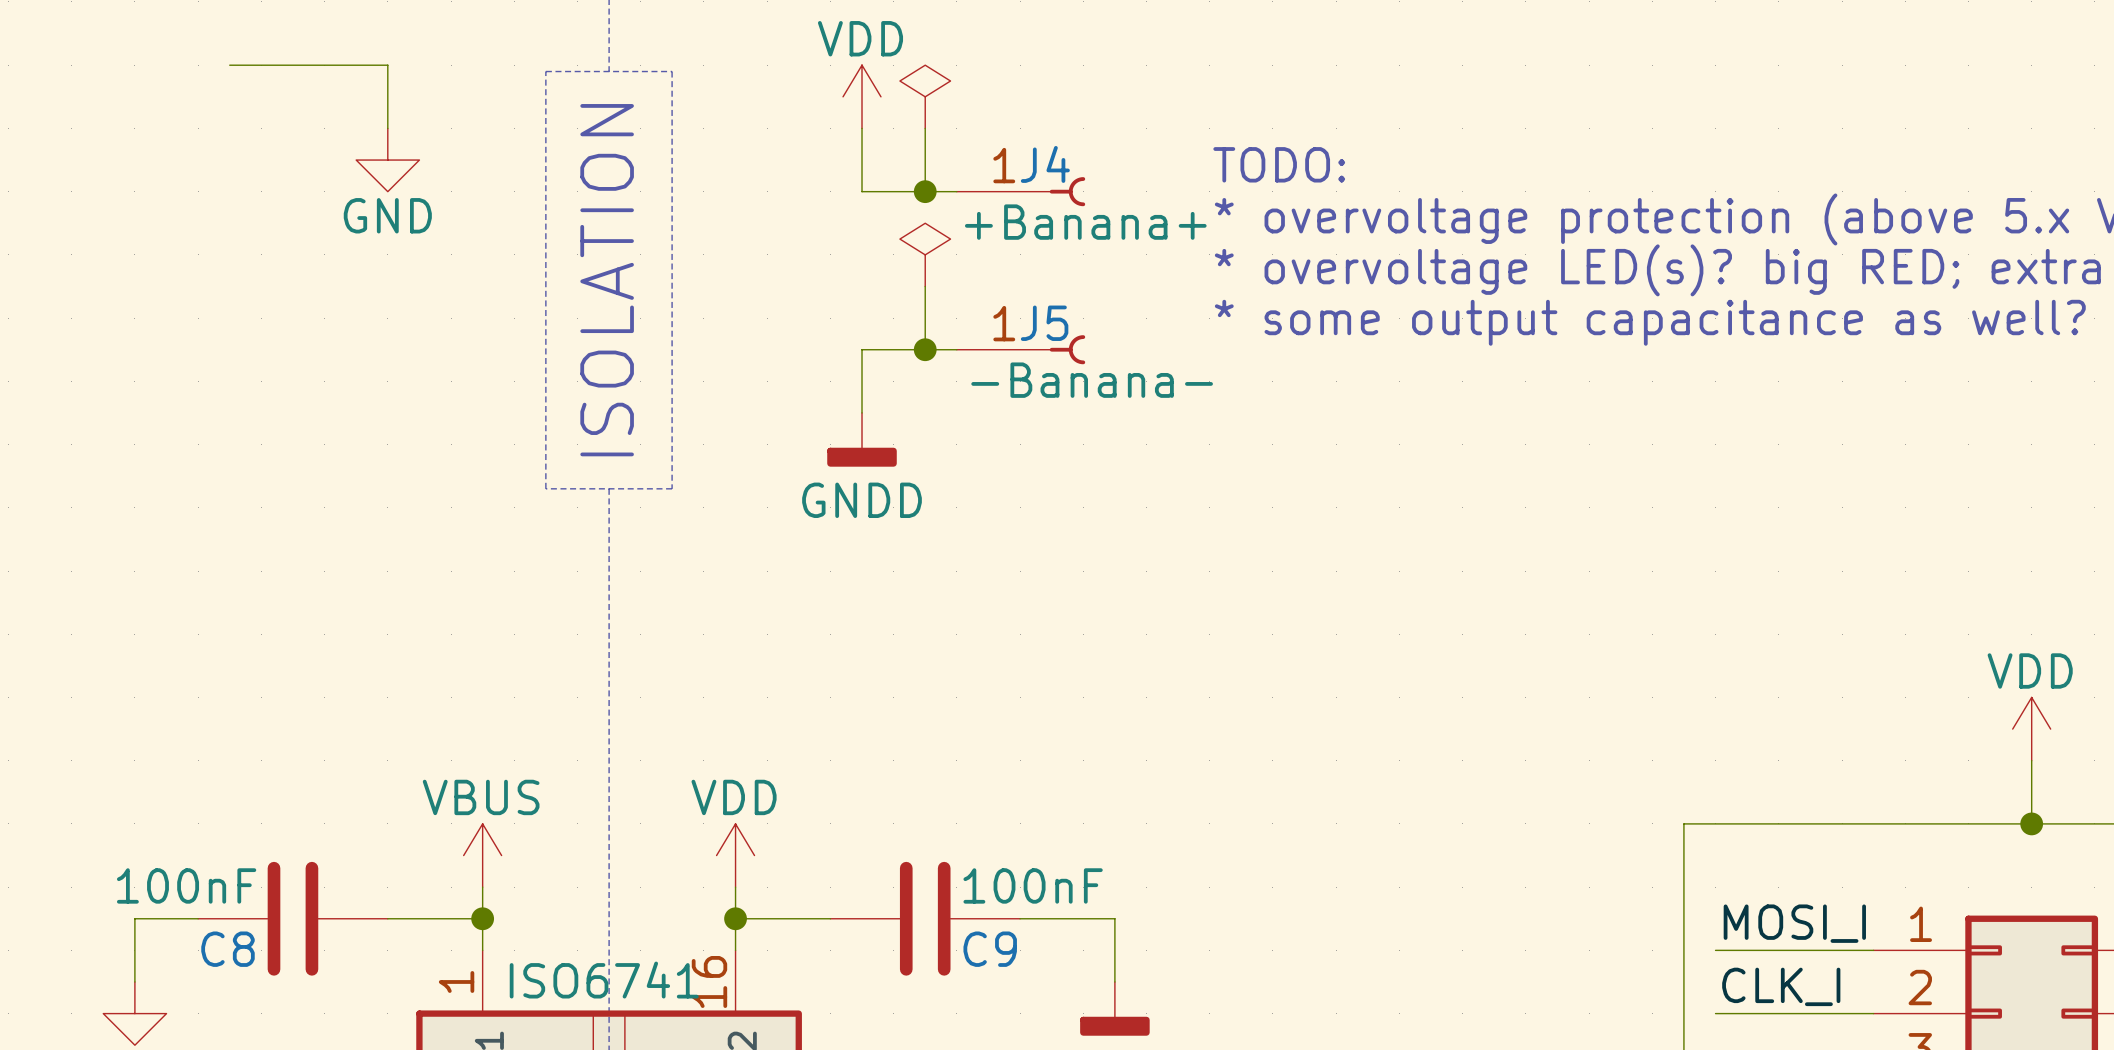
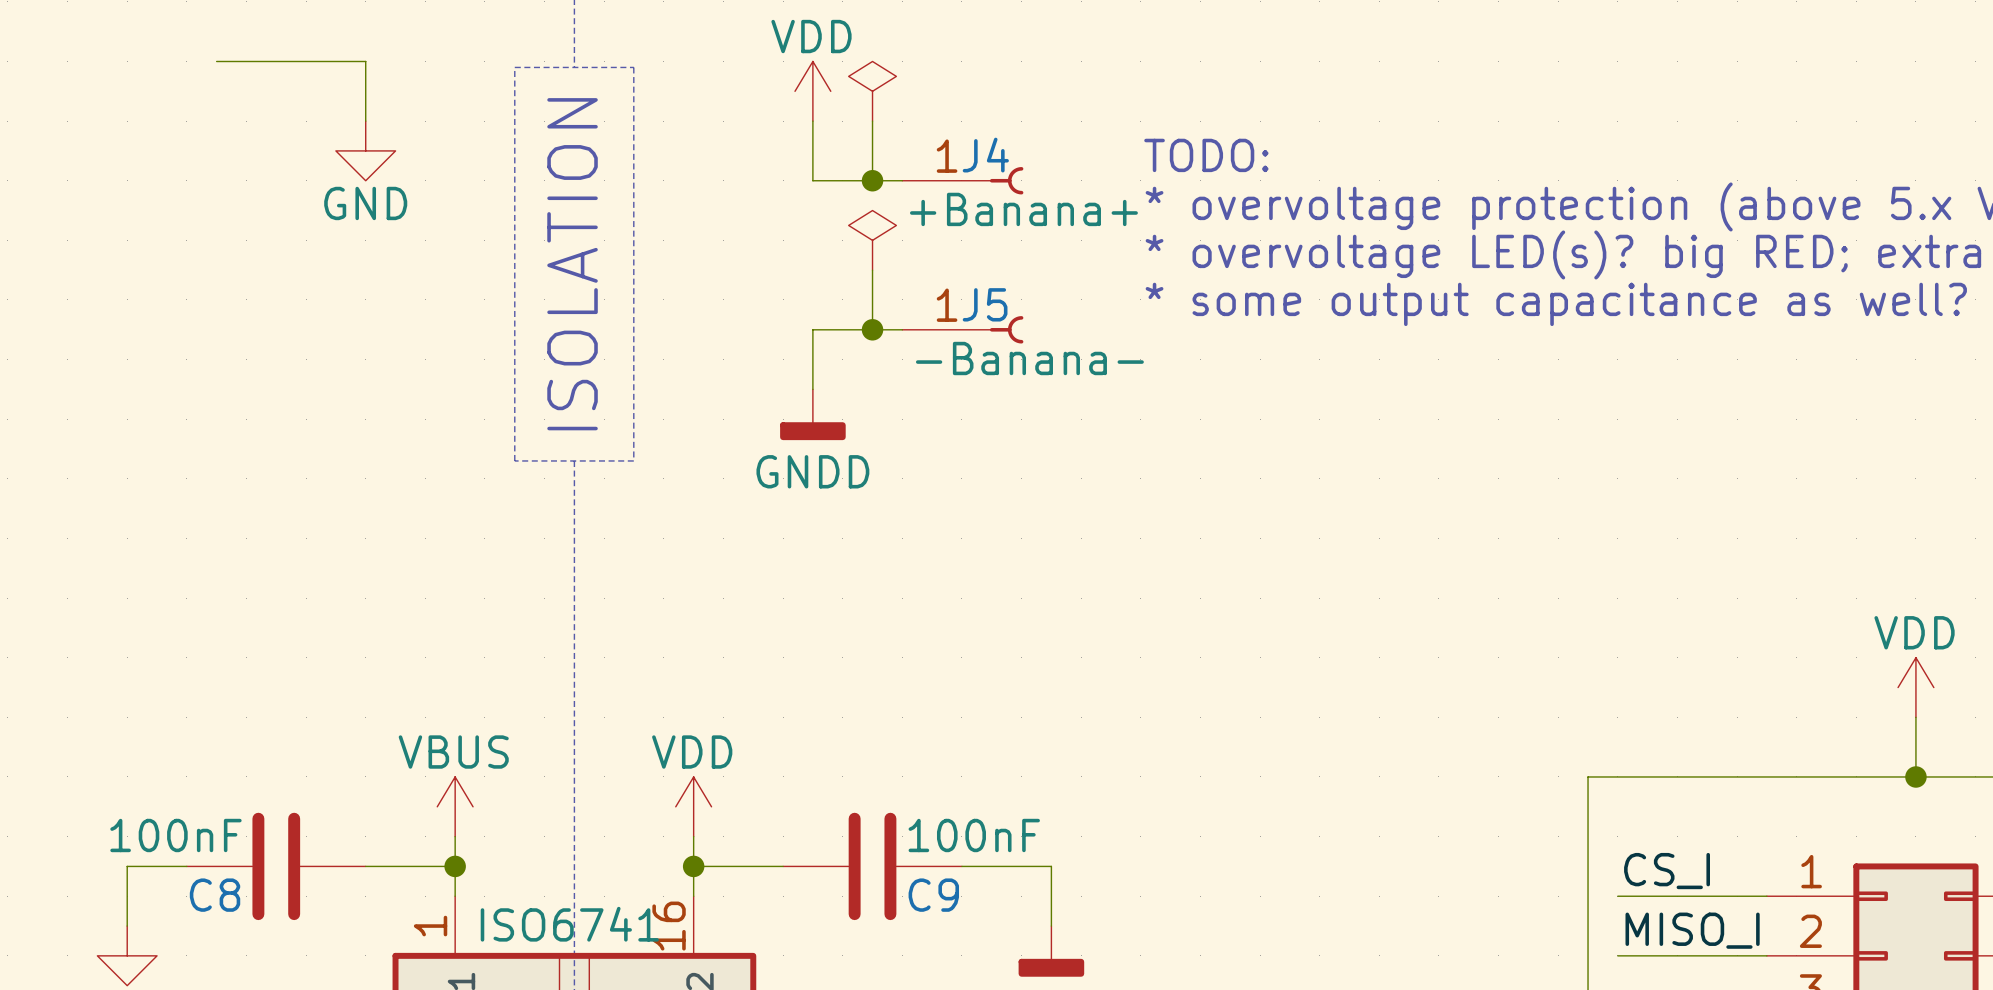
label: MOSI_I (1794, 923) -> CS_I (1667, 871)
label: CLK_I (1781, 986) -> MISO_I (1692, 930)

